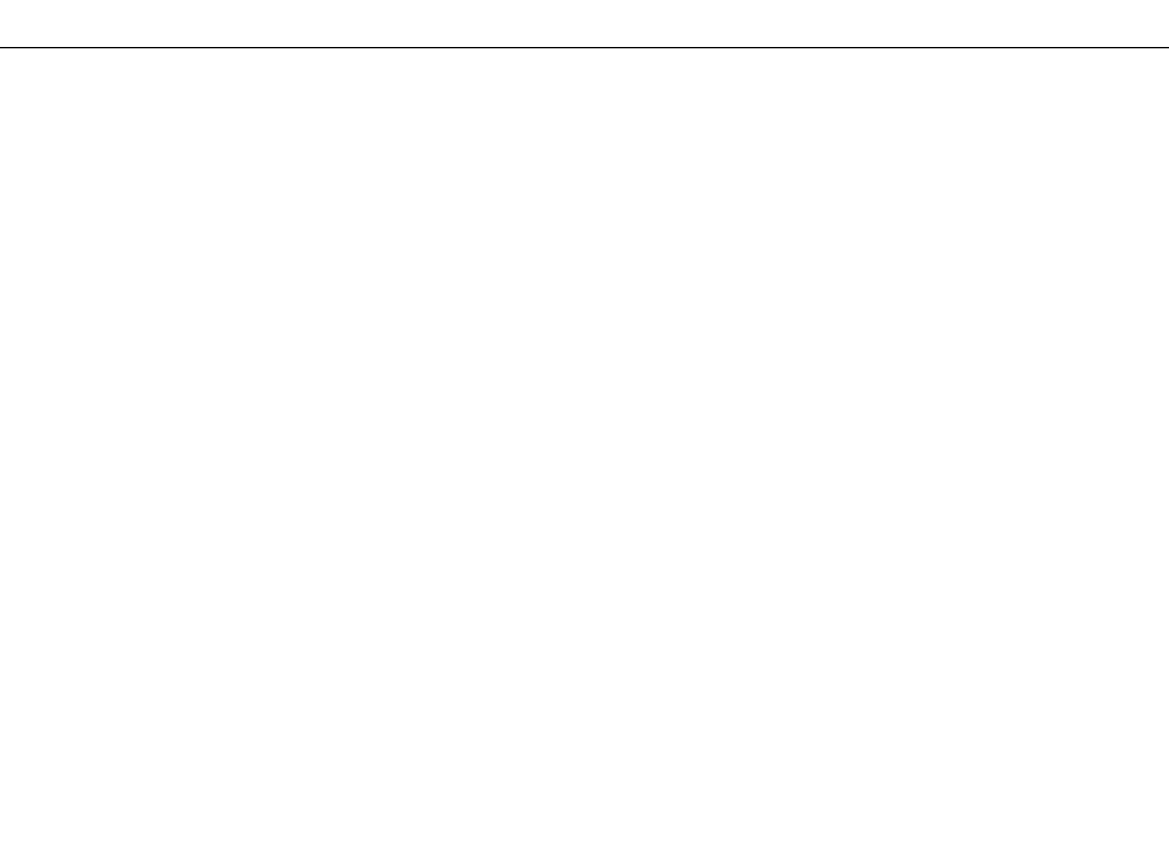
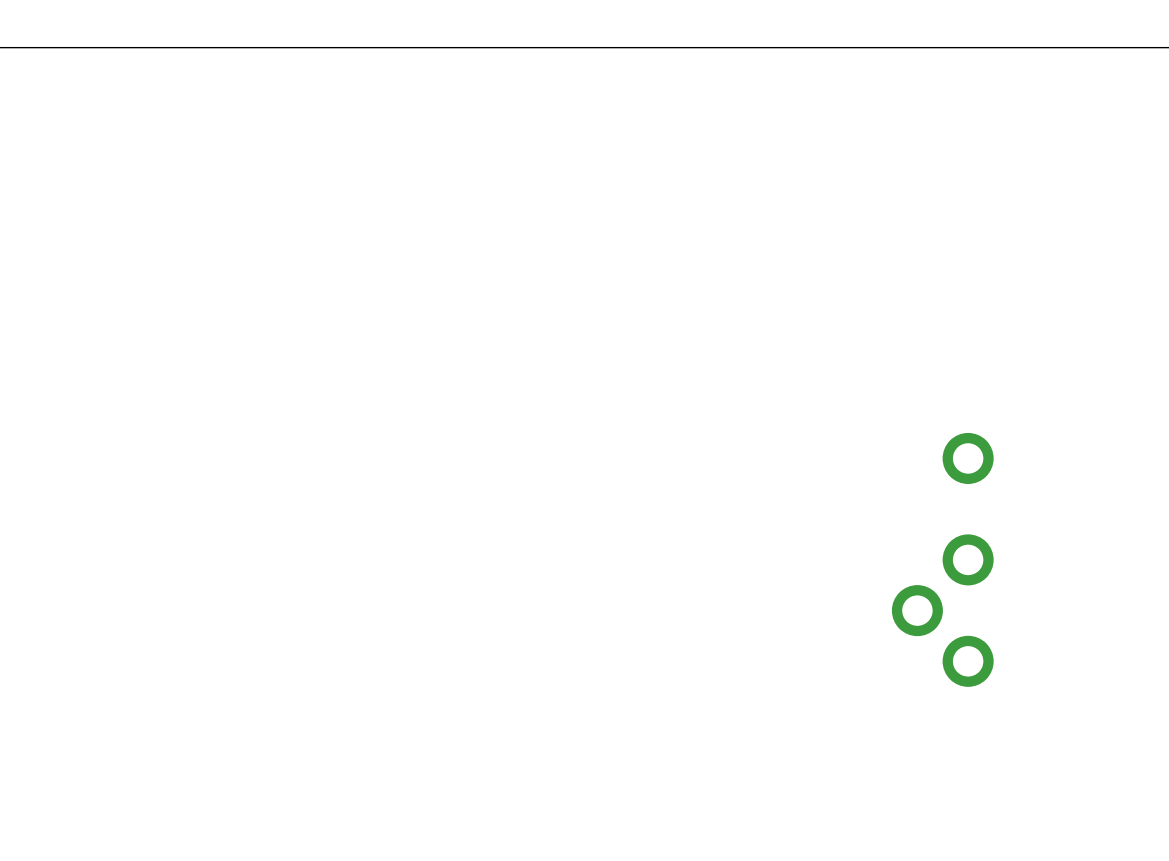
via: none -> (968, 458)
via: none -> (968, 559)
via: none -> (917, 610)
via: none -> (968, 661)

